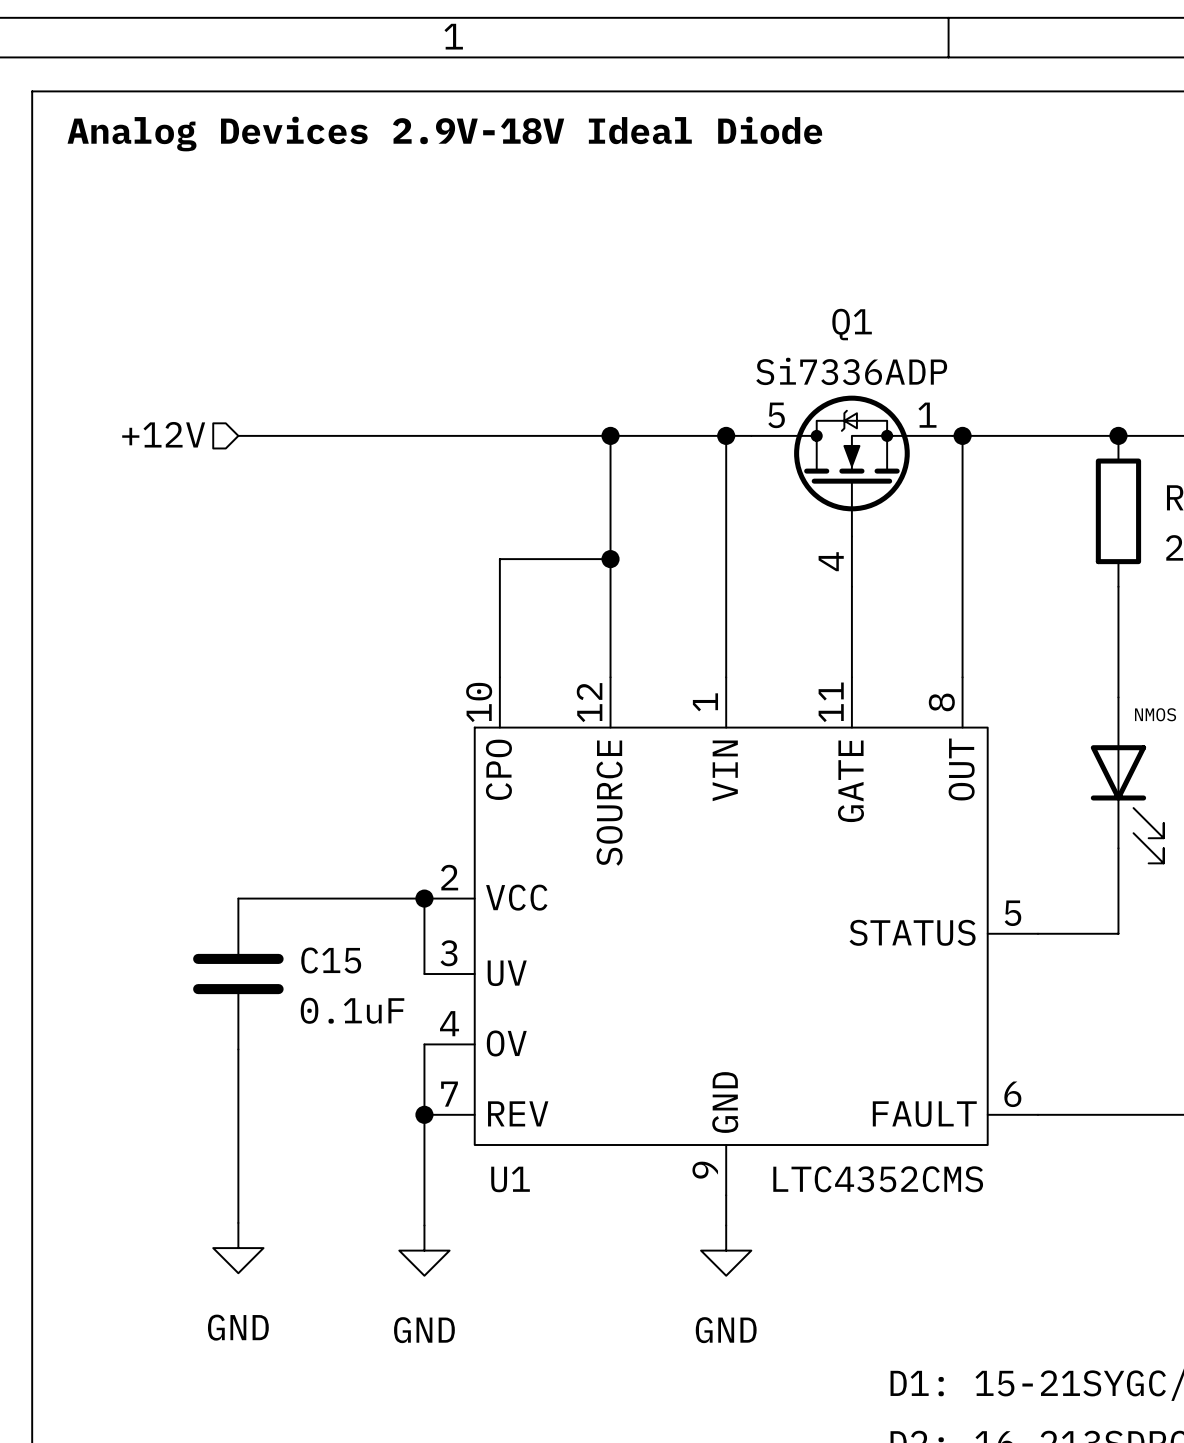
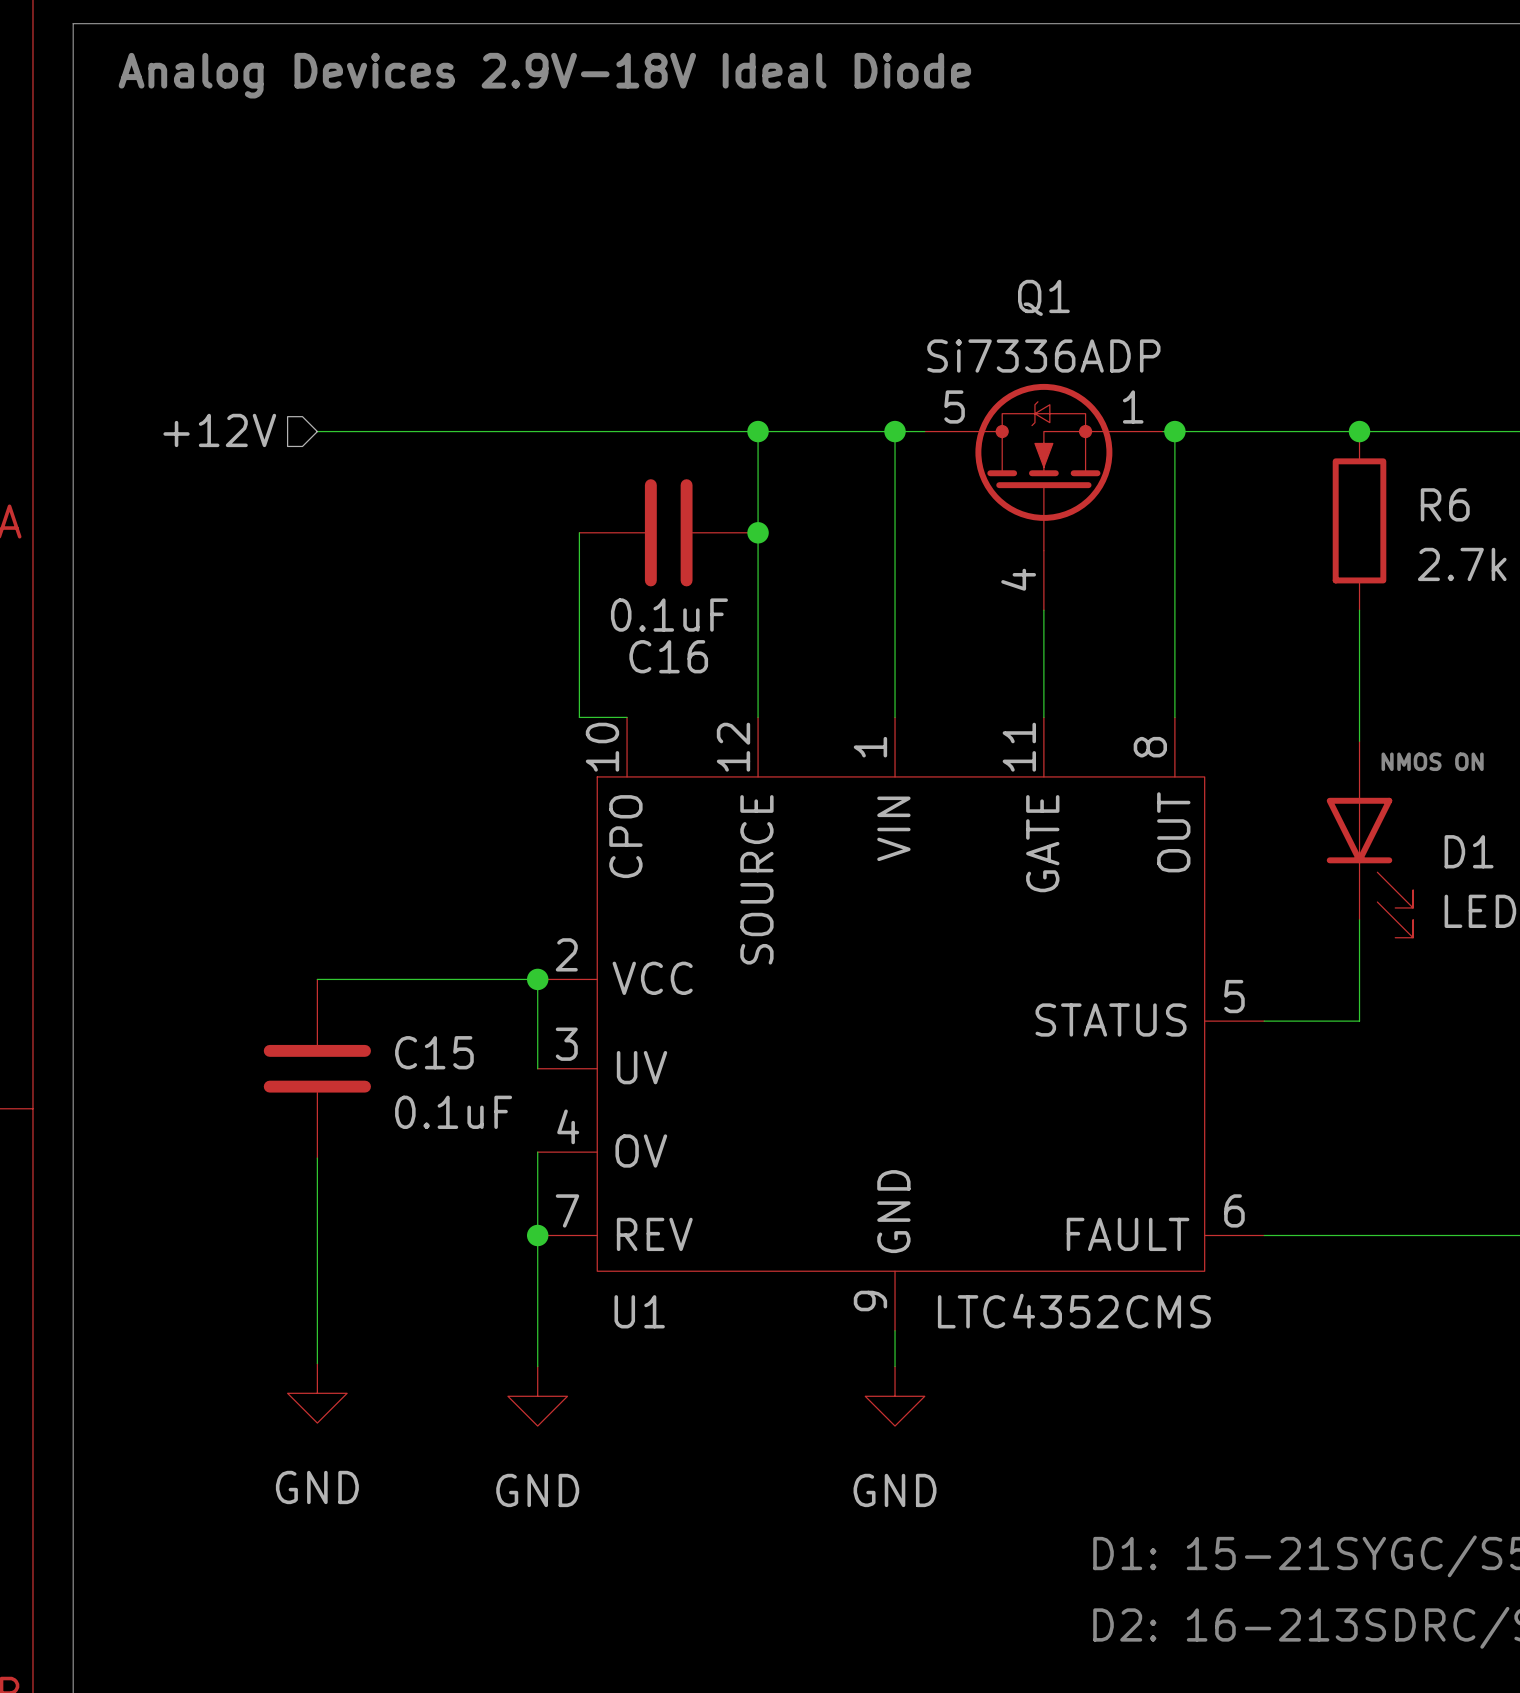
C16: none -> 0.1uF (668, 532)
wire: (610, 559) (499, 559) (499, 677) -> (579, 532) (579, 717) (627, 717)
junction position: (610, 559) -> (758, 532)

